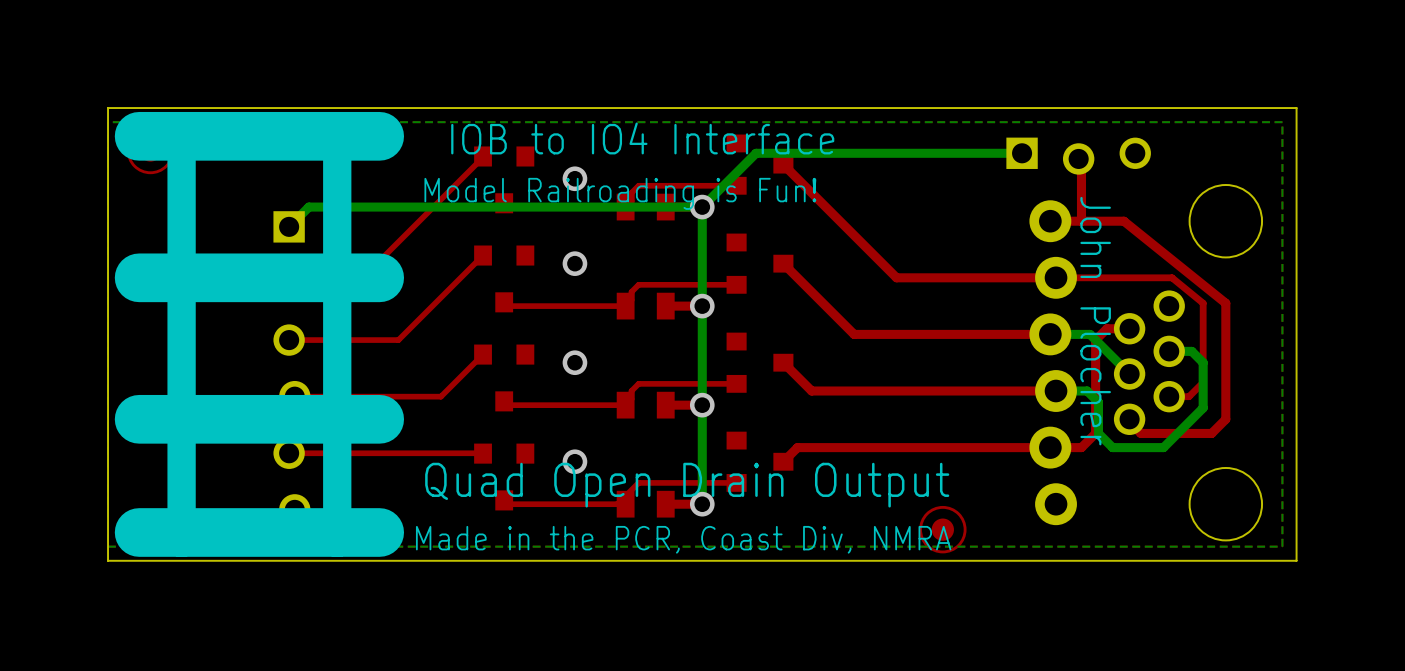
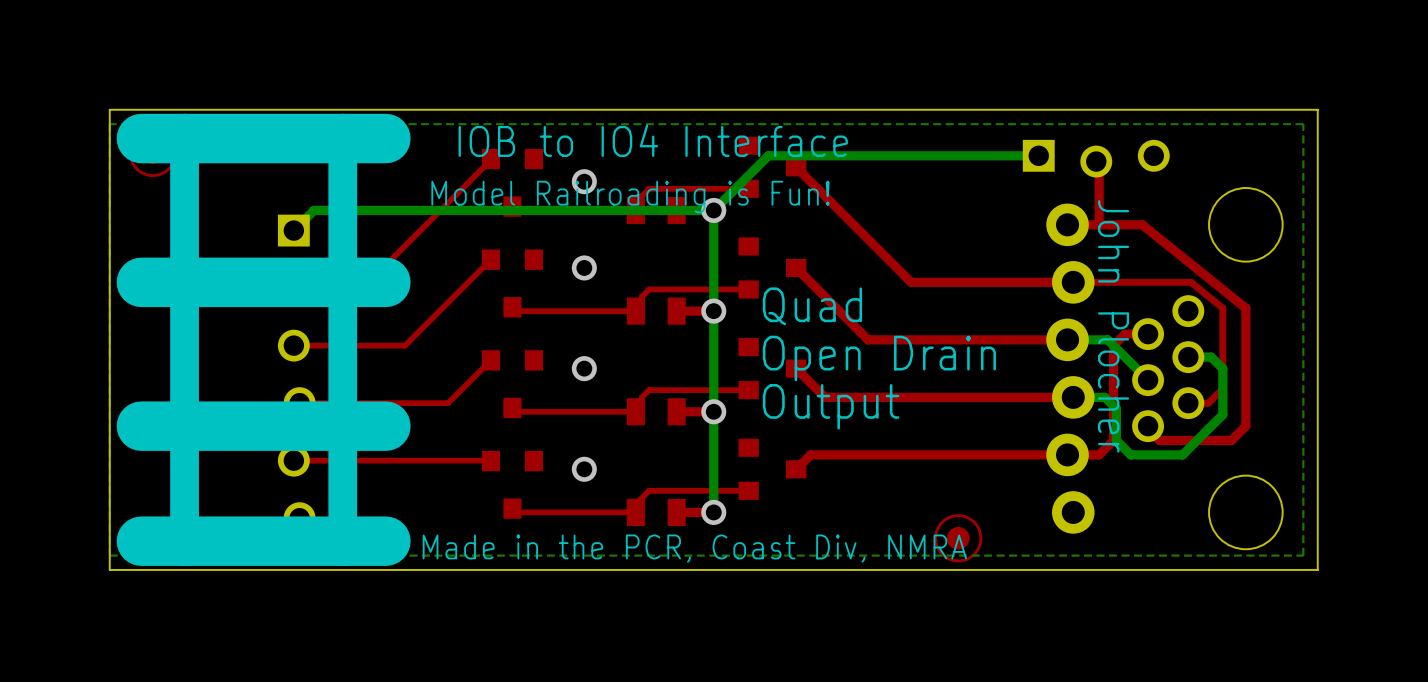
text: none -> Quad (812, 306)
text: none -> Open Drain (879, 358)
text: none -> Output (831, 406)
text: Quad Open Drain Output (687, 485) -> none

